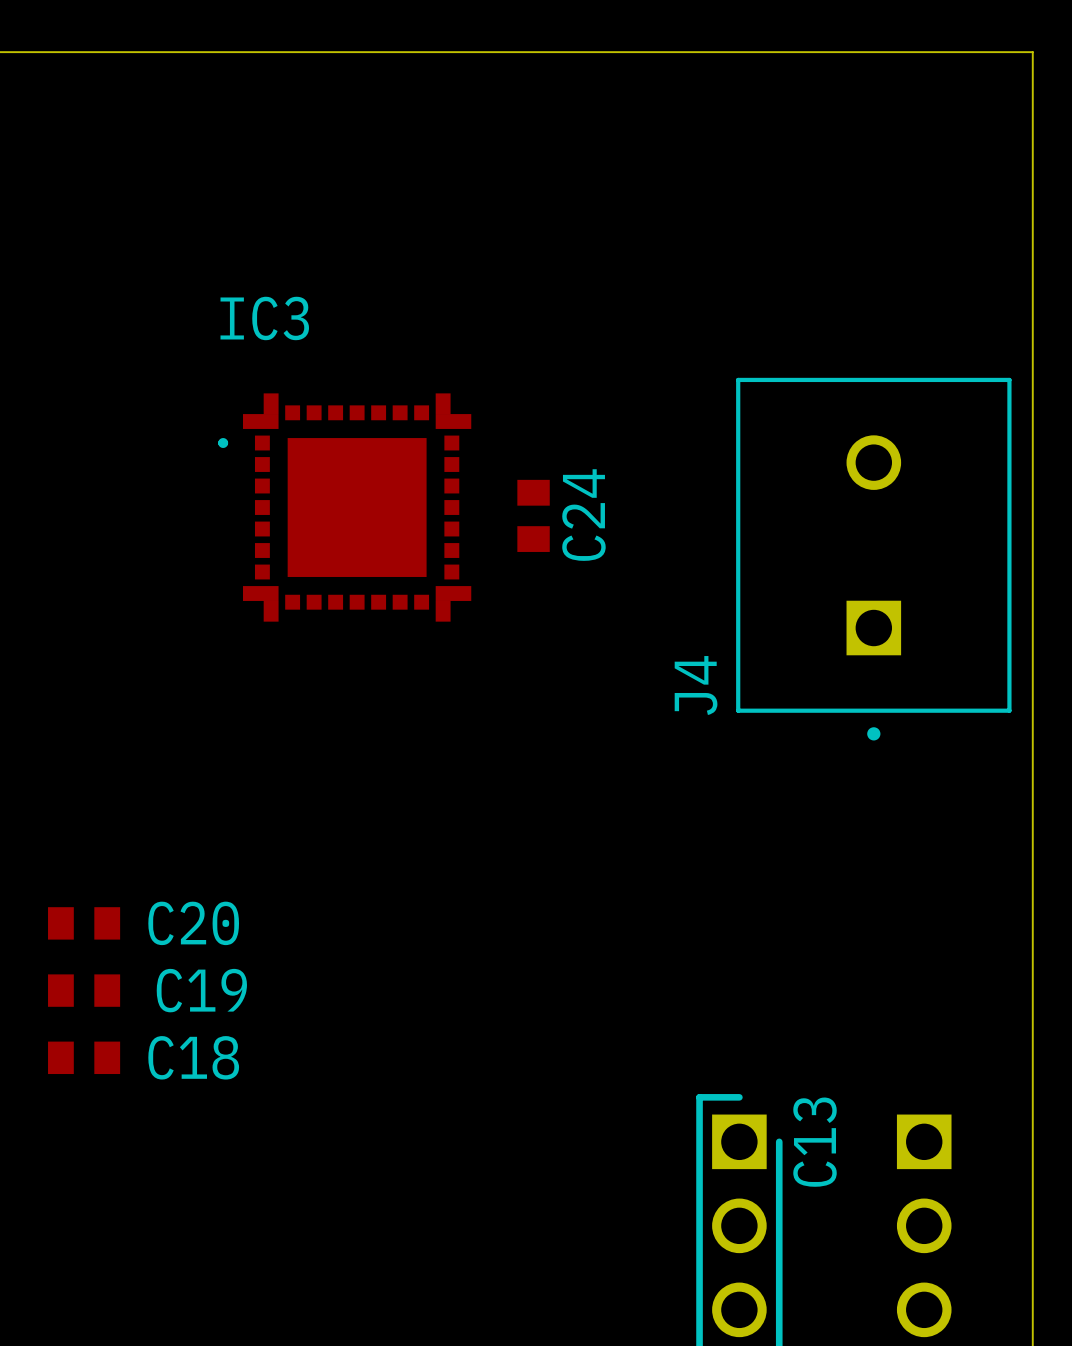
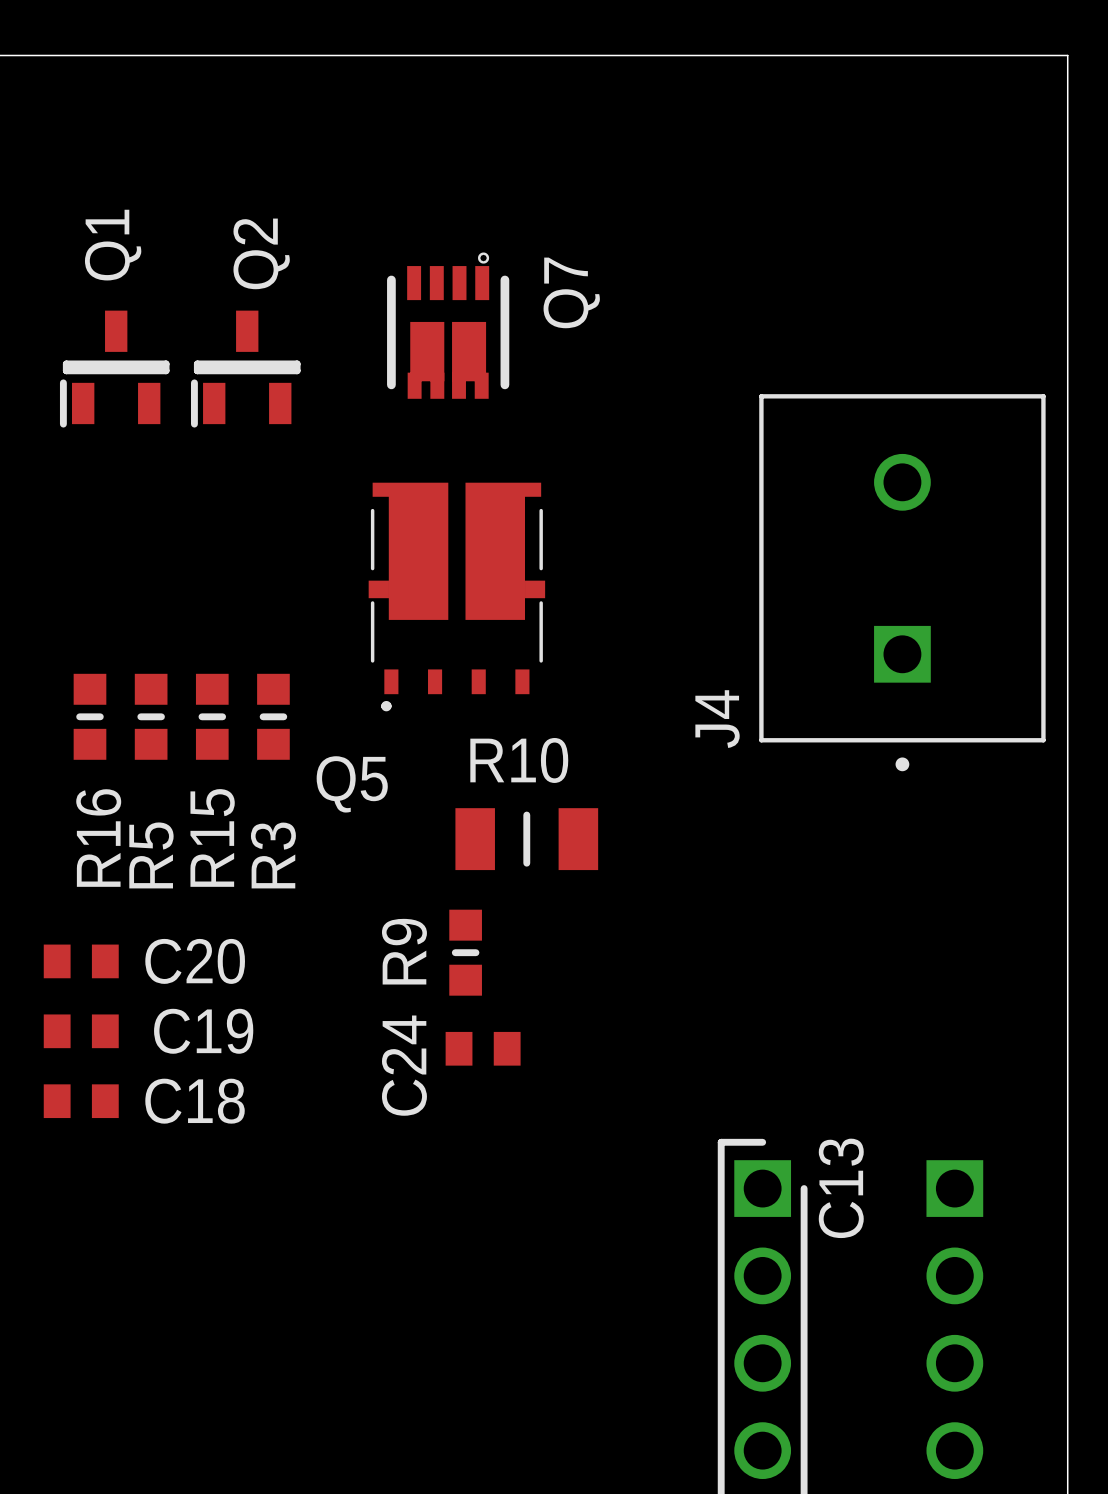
Q7: none -> (448, 325)
Q1: none -> (114, 369)
Q2: none -> (245, 369)
IC3: (344, 507) -> none
C24 rotation: 0° (533, 515) -> 90° clockwise (483, 1048)
C24 position: (533, 515) -> (483, 1048)
C24 name position: C24 (583, 515) -> C24 (404, 1065)
Q5: none -> (456, 597)
R16: none -> (89, 716)
R5: none -> (151, 716)
R15: none -> (212, 716)
R3: none -> (273, 716)
R10: none -> (526, 839)
R9: none -> (465, 952)

